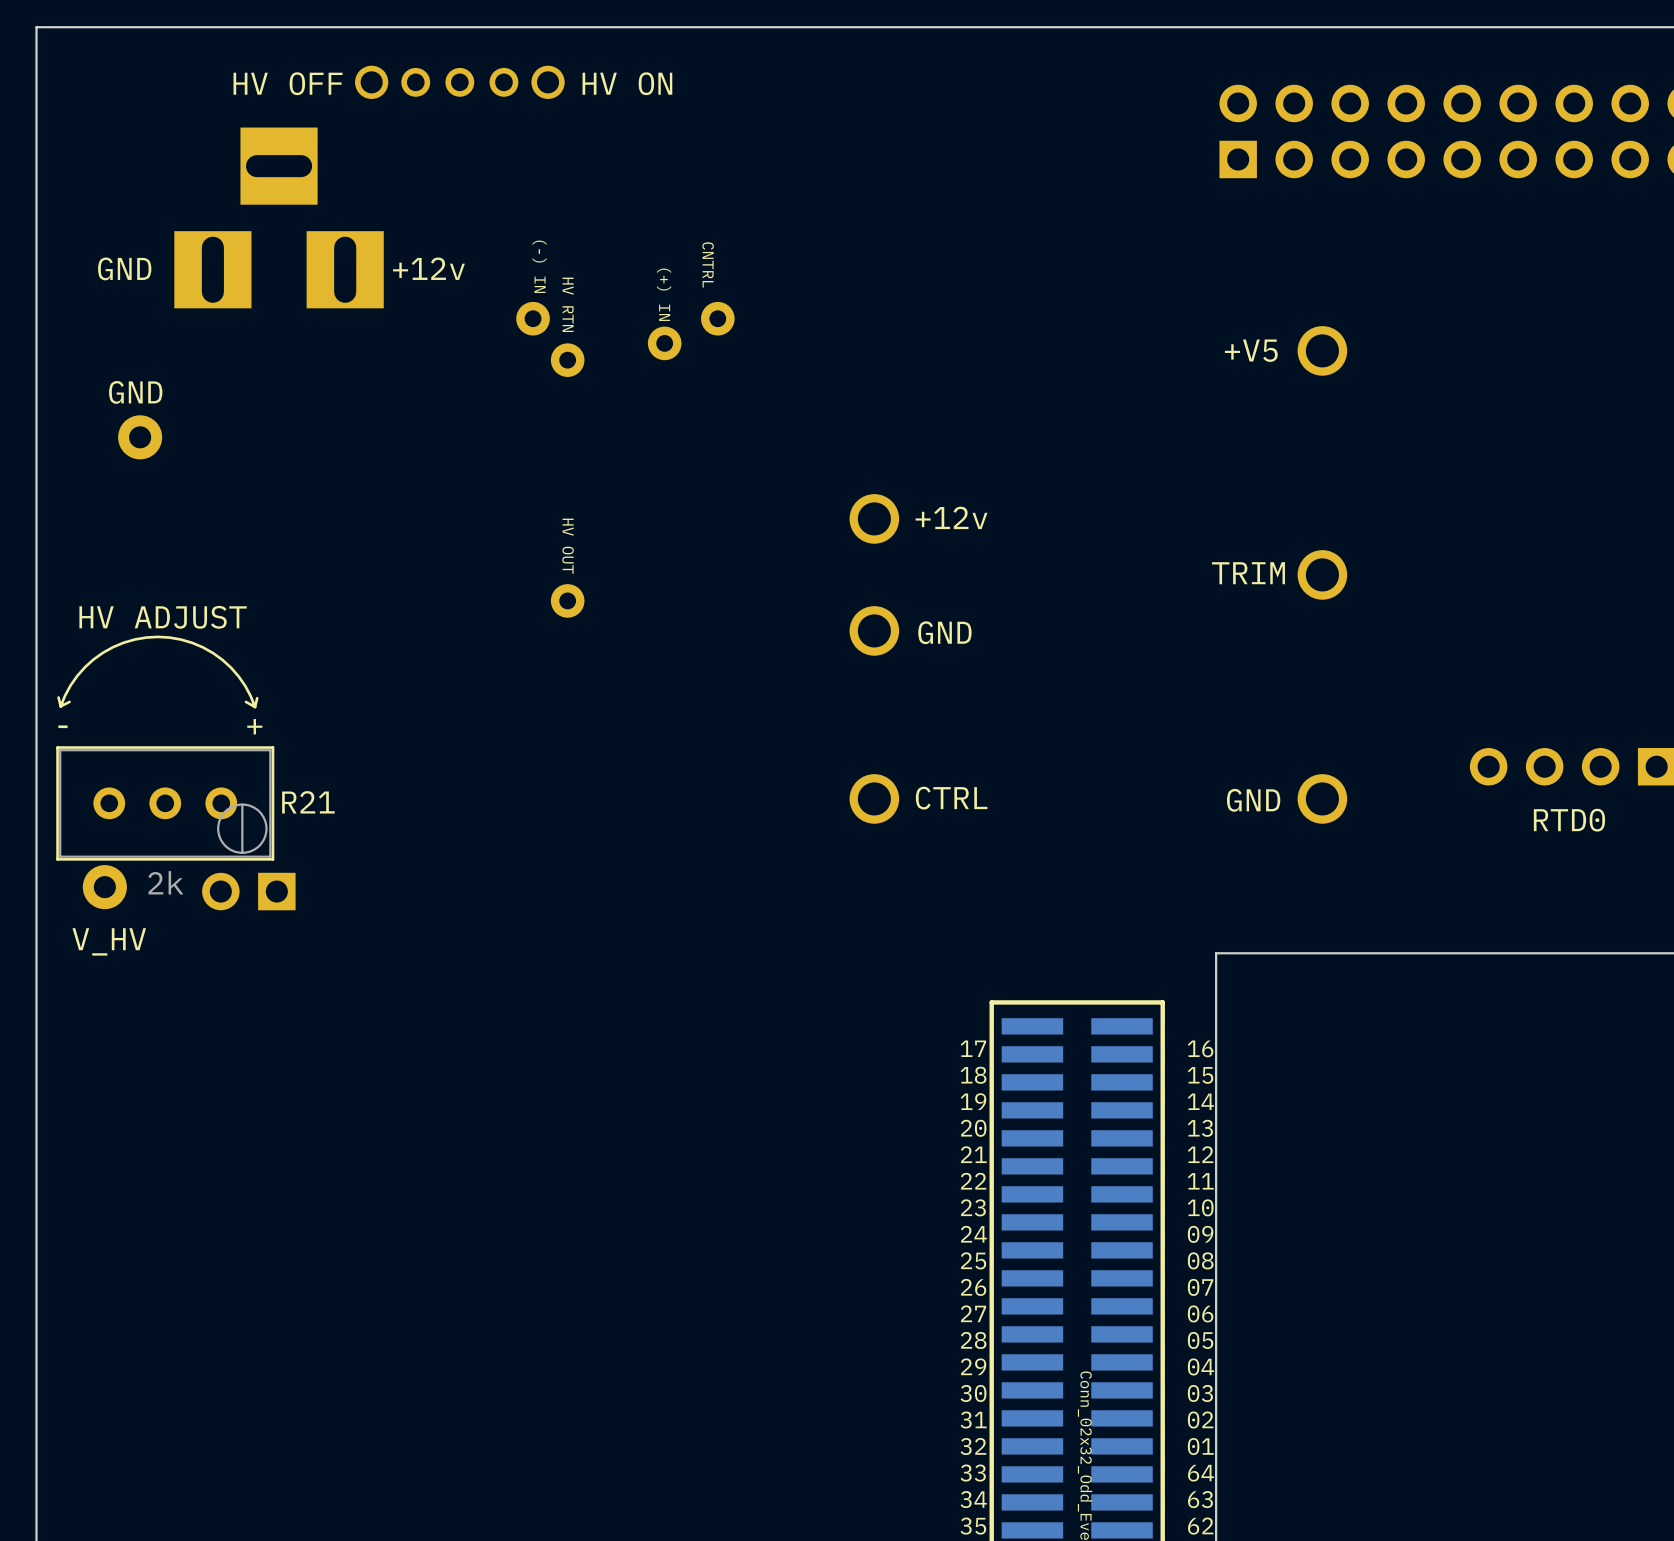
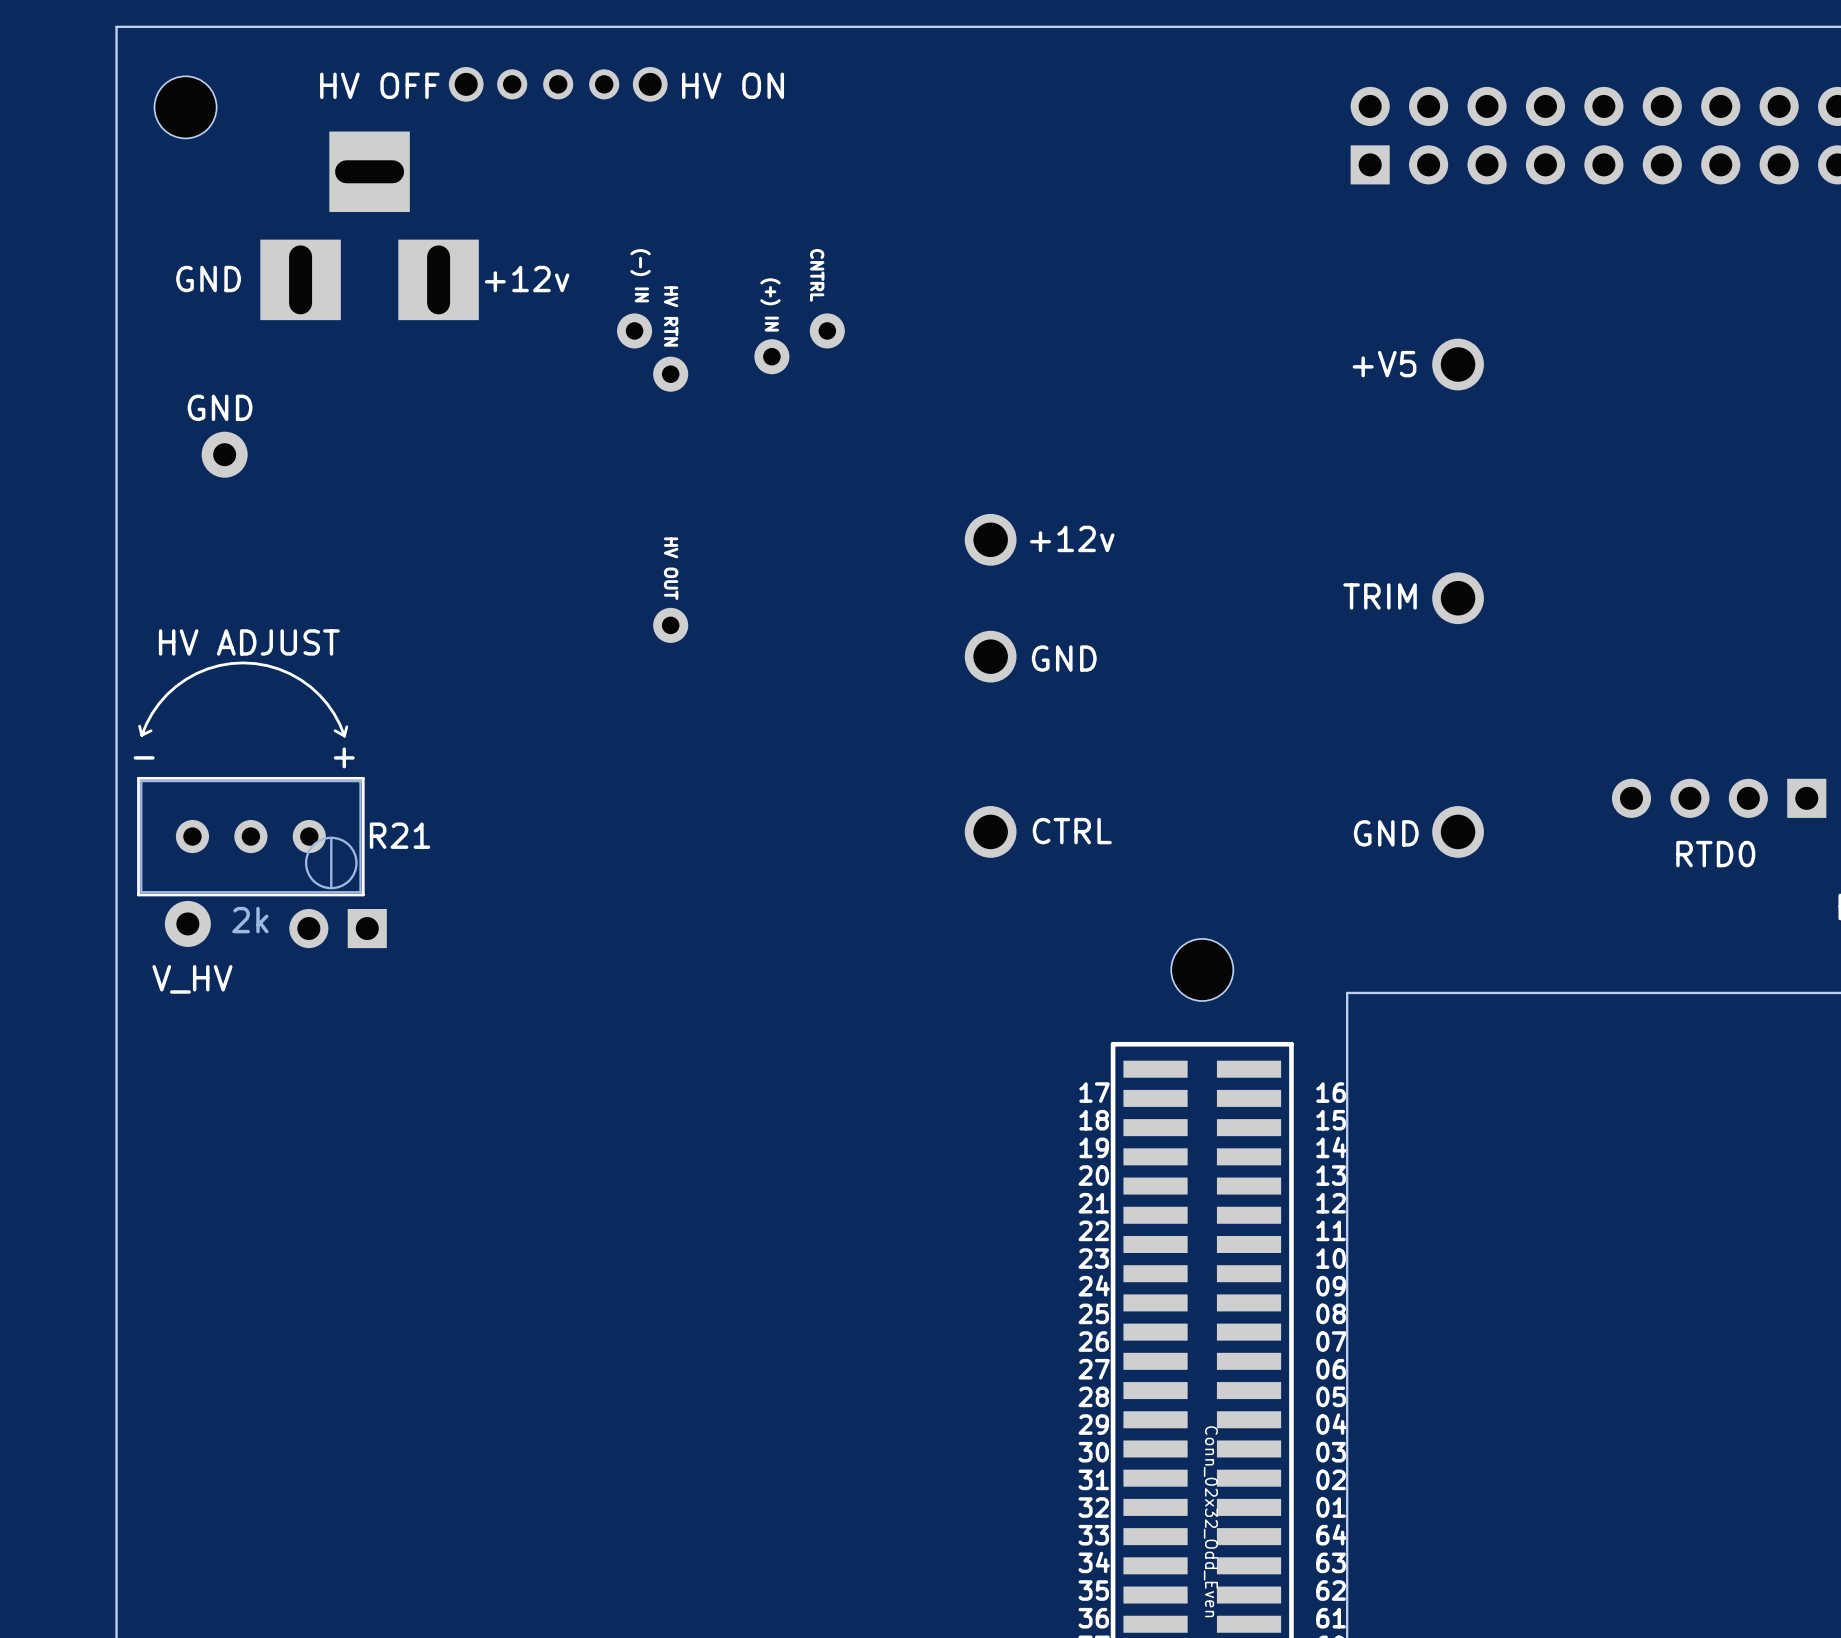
part: none -> (185, 107)
part: none -> (1202, 969)

